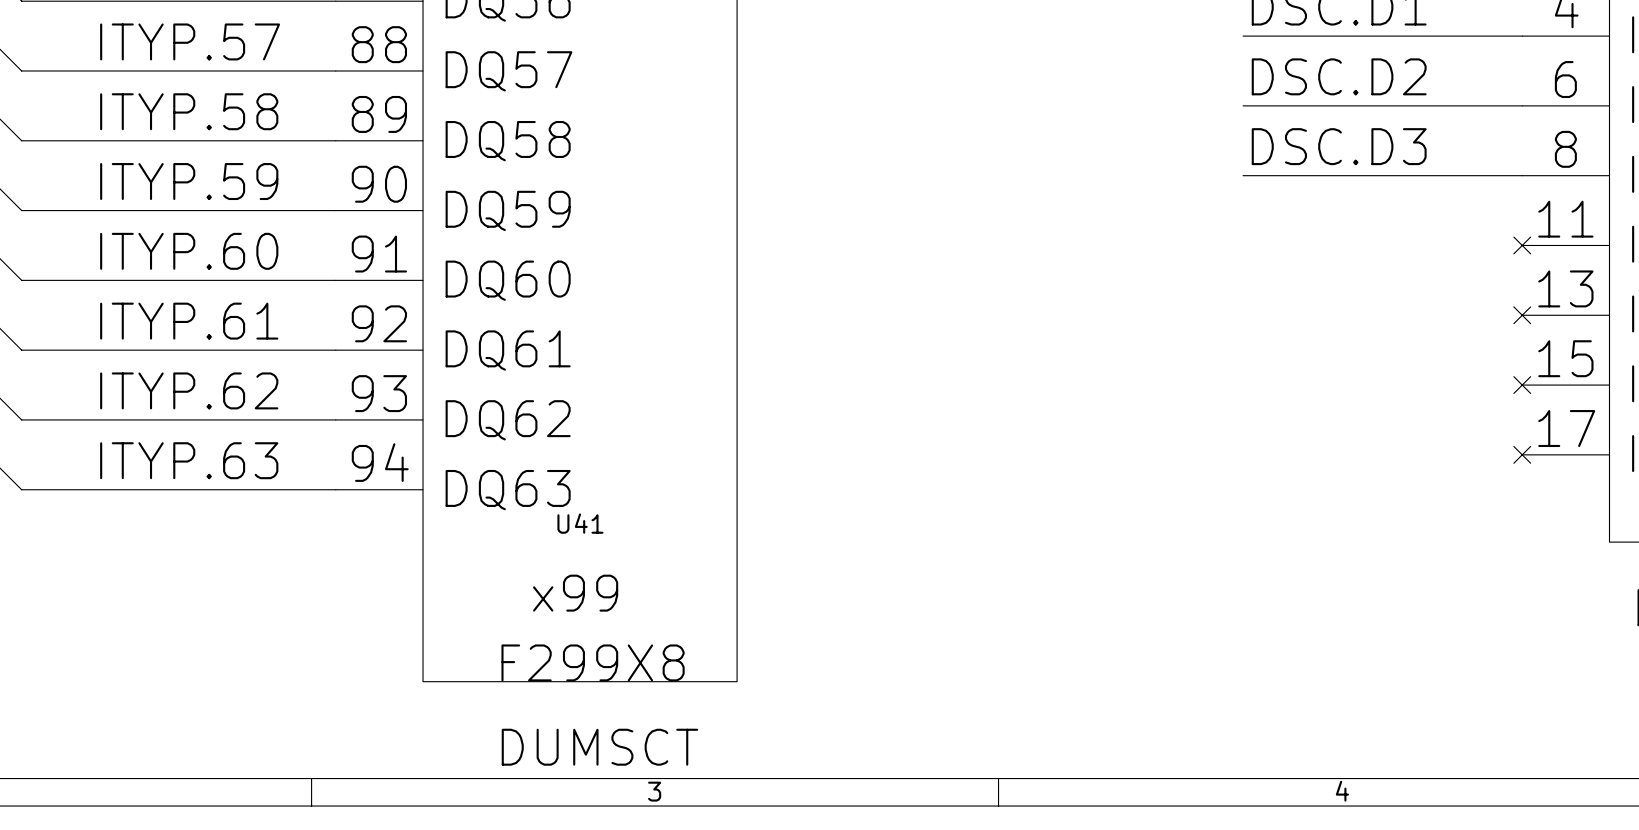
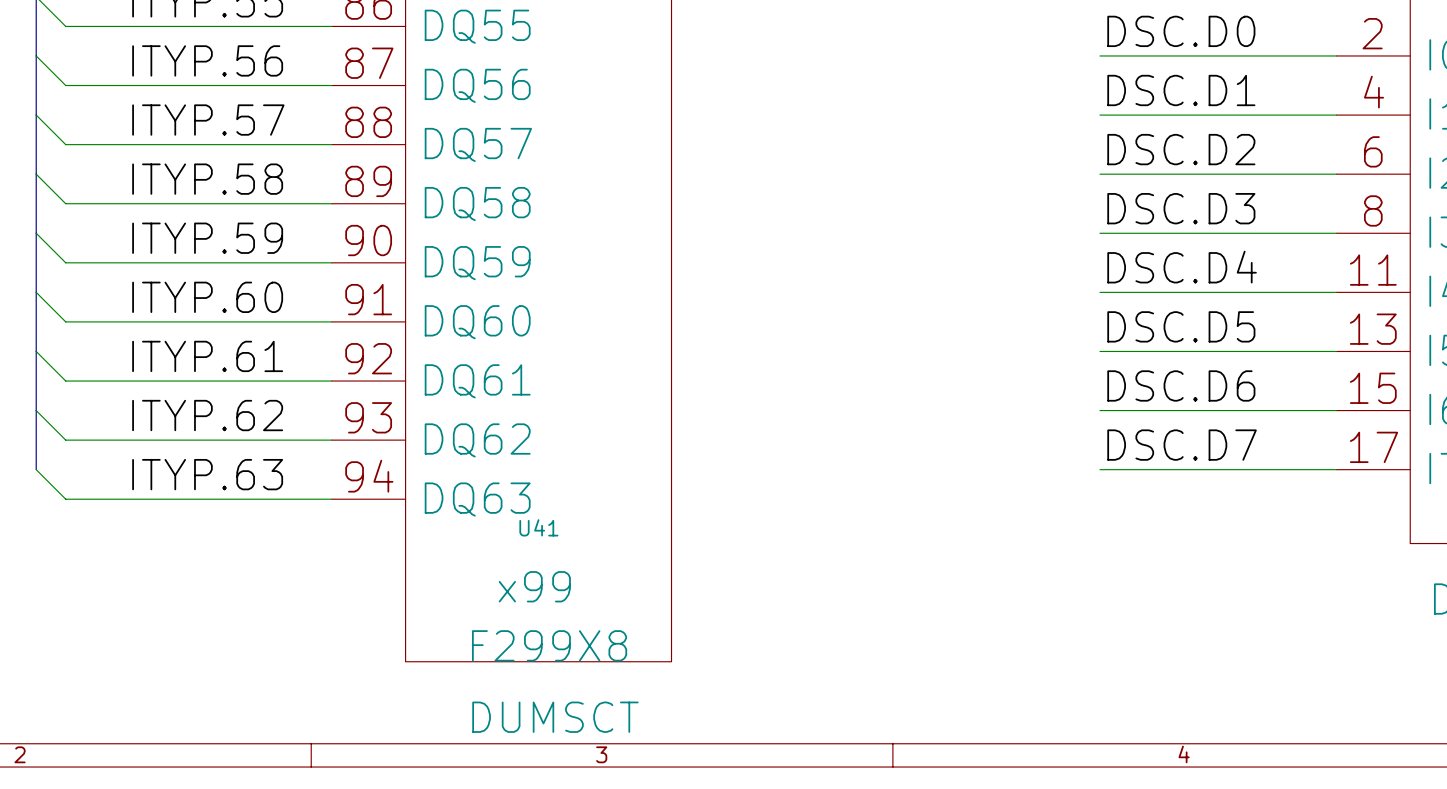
label: none -> DSC.D4 (1182, 267)
wire: none -> (1099, 292) (1336, 292)
no-connect mark: (1522, 245) -> none
label: none -> DSC.D5 (1181, 326)
wire: none -> (1099, 351) (1336, 351)
no-connect mark: (1522, 315) -> none
label: none -> DSC.D6 (1181, 385)
wire: none -> (1099, 410) (1336, 410)
no-connect mark: (1522, 385) -> none
label: none -> DSC.D7 (1182, 445)
wire: none -> (1099, 469) (1336, 469)
no-connect mark: (1522, 454) -> none

